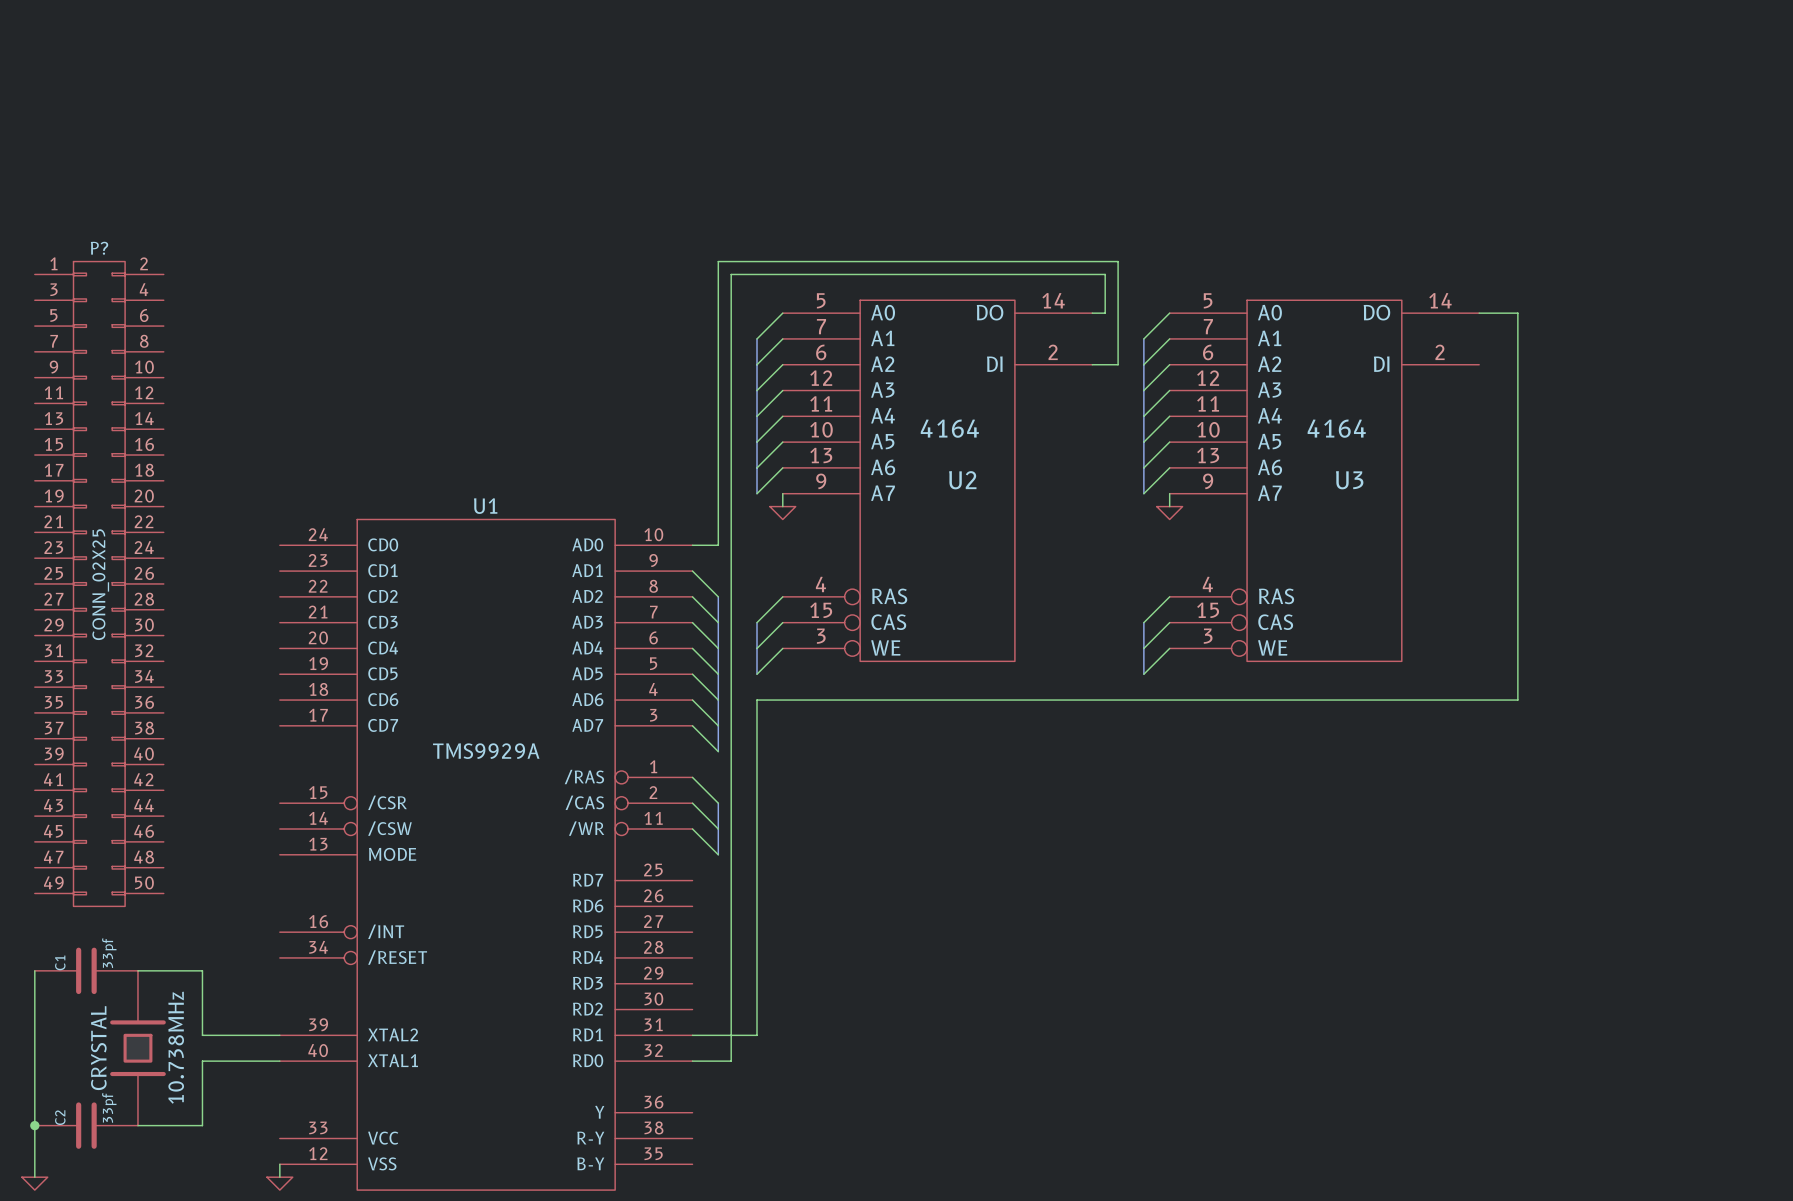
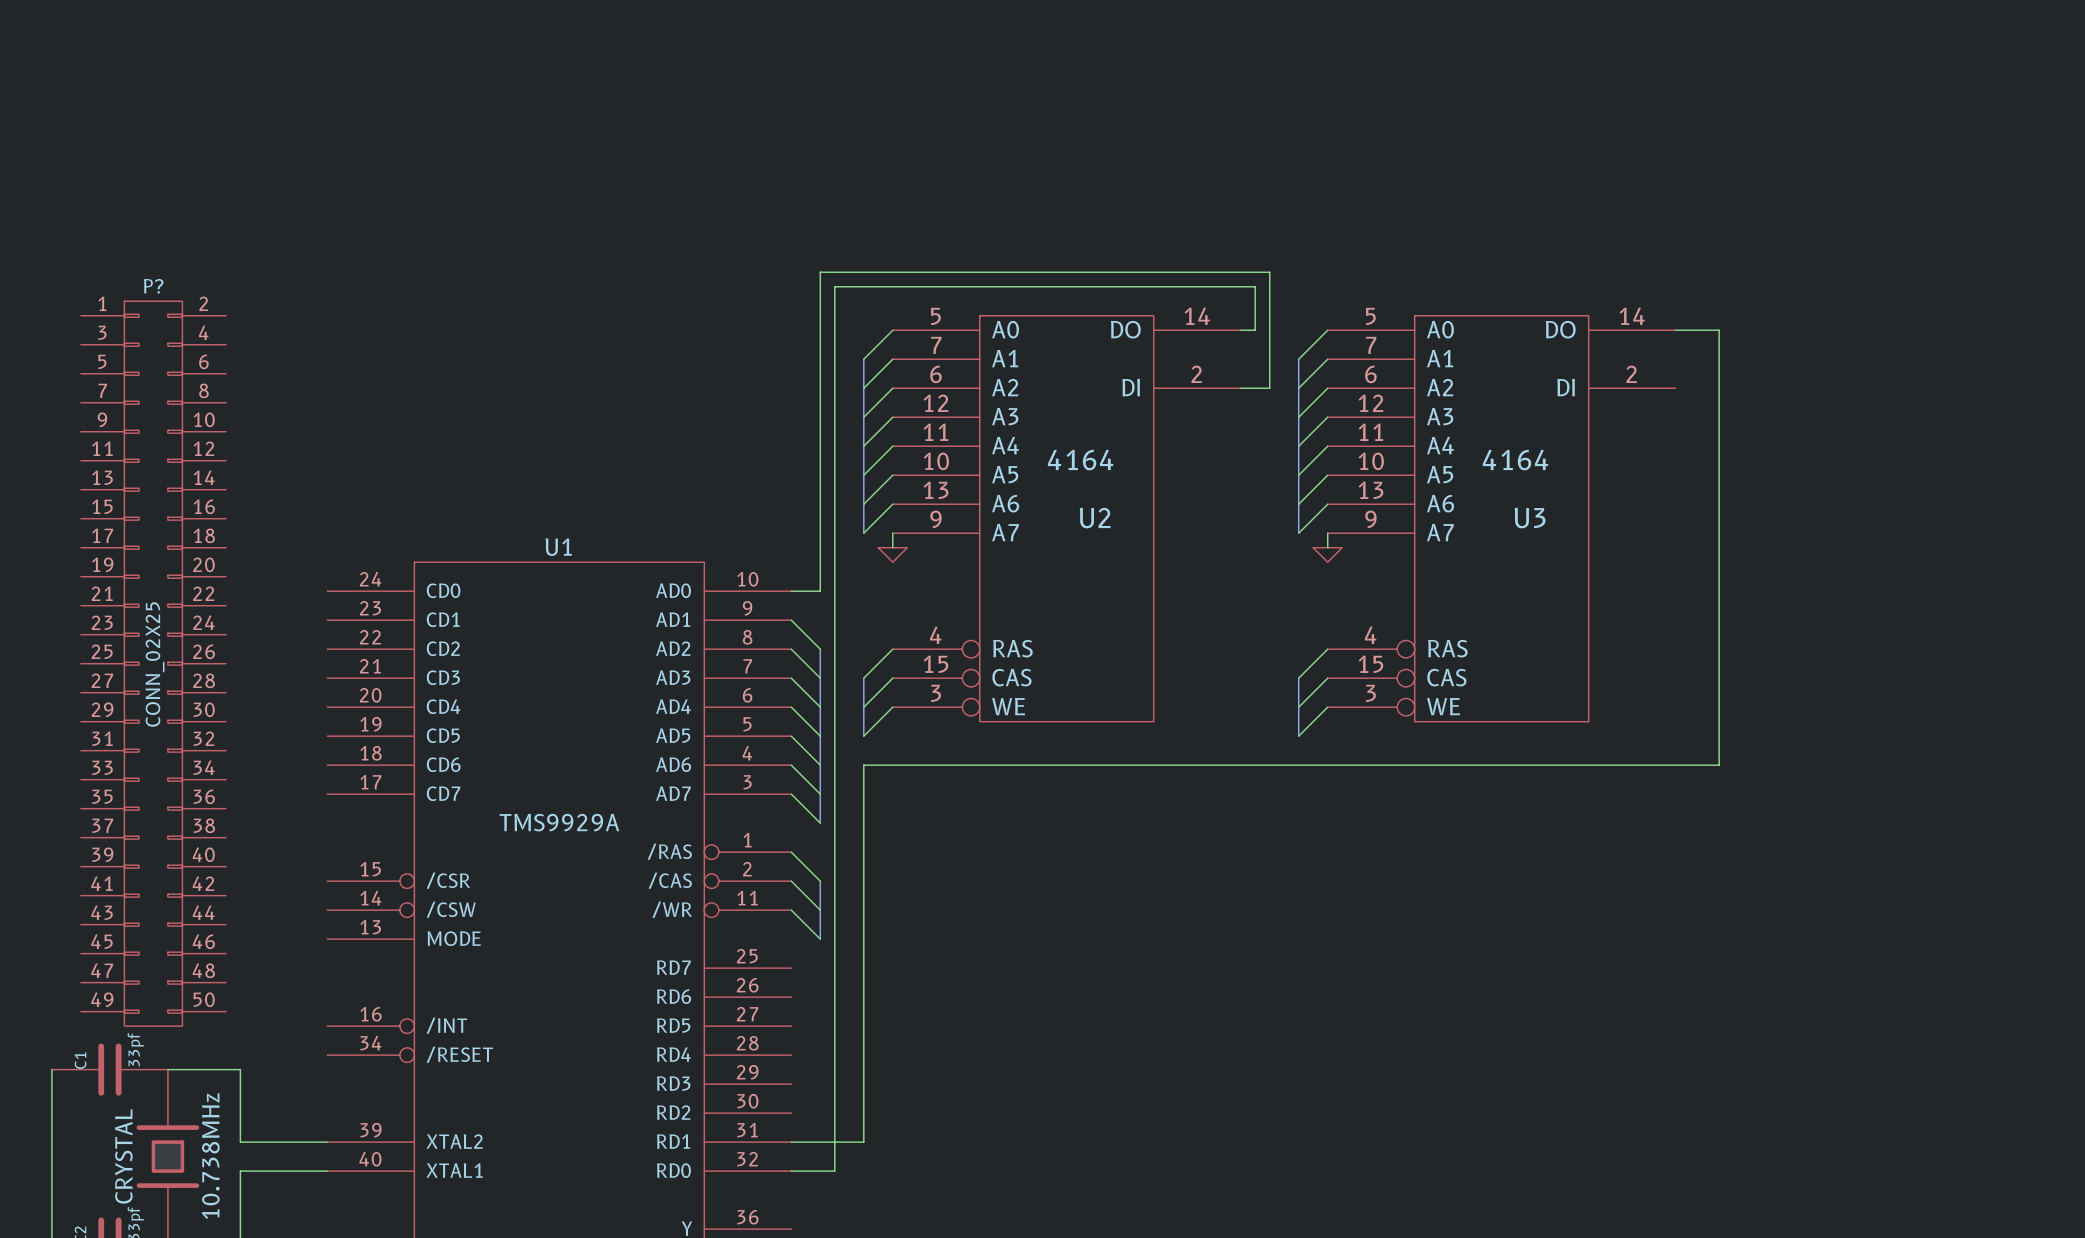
P? position: (99, 583) -> (153, 663)

